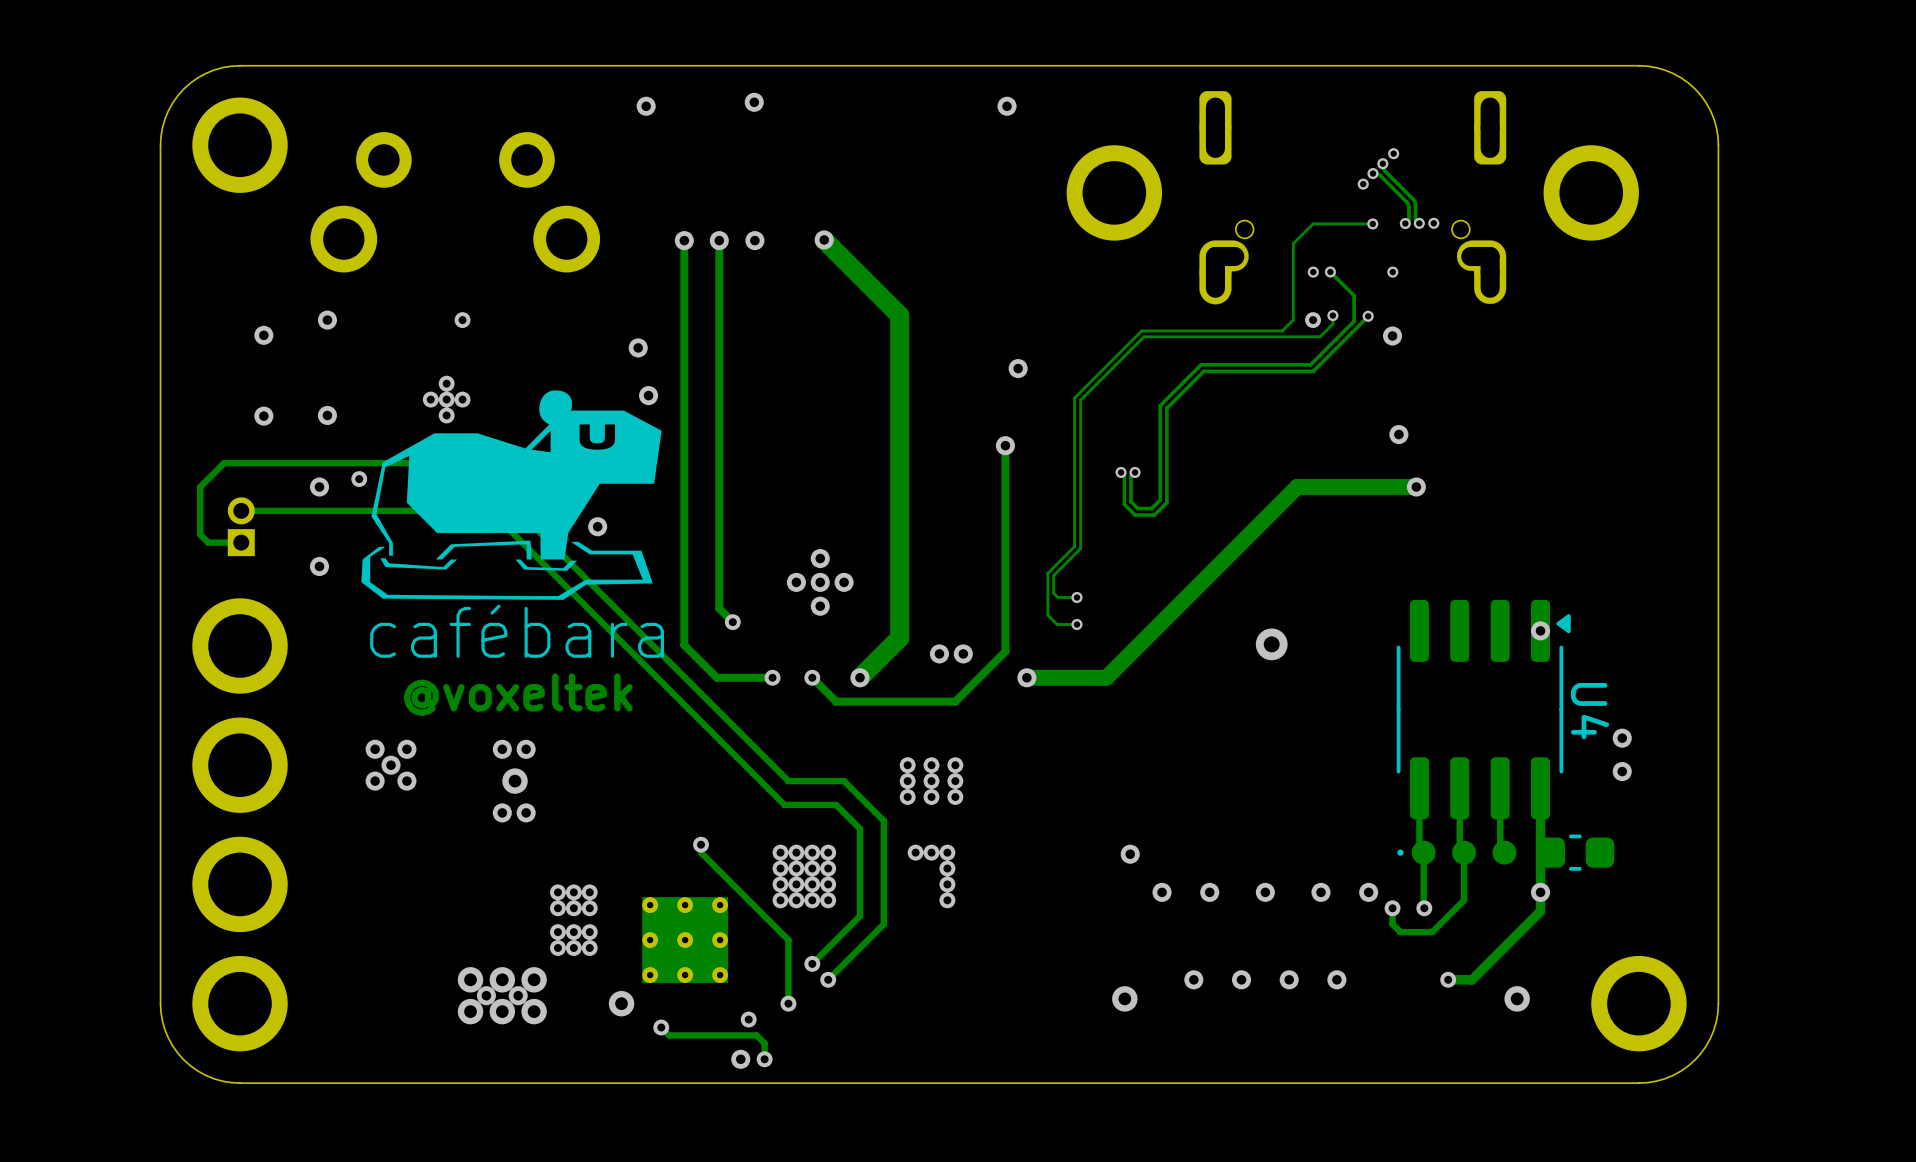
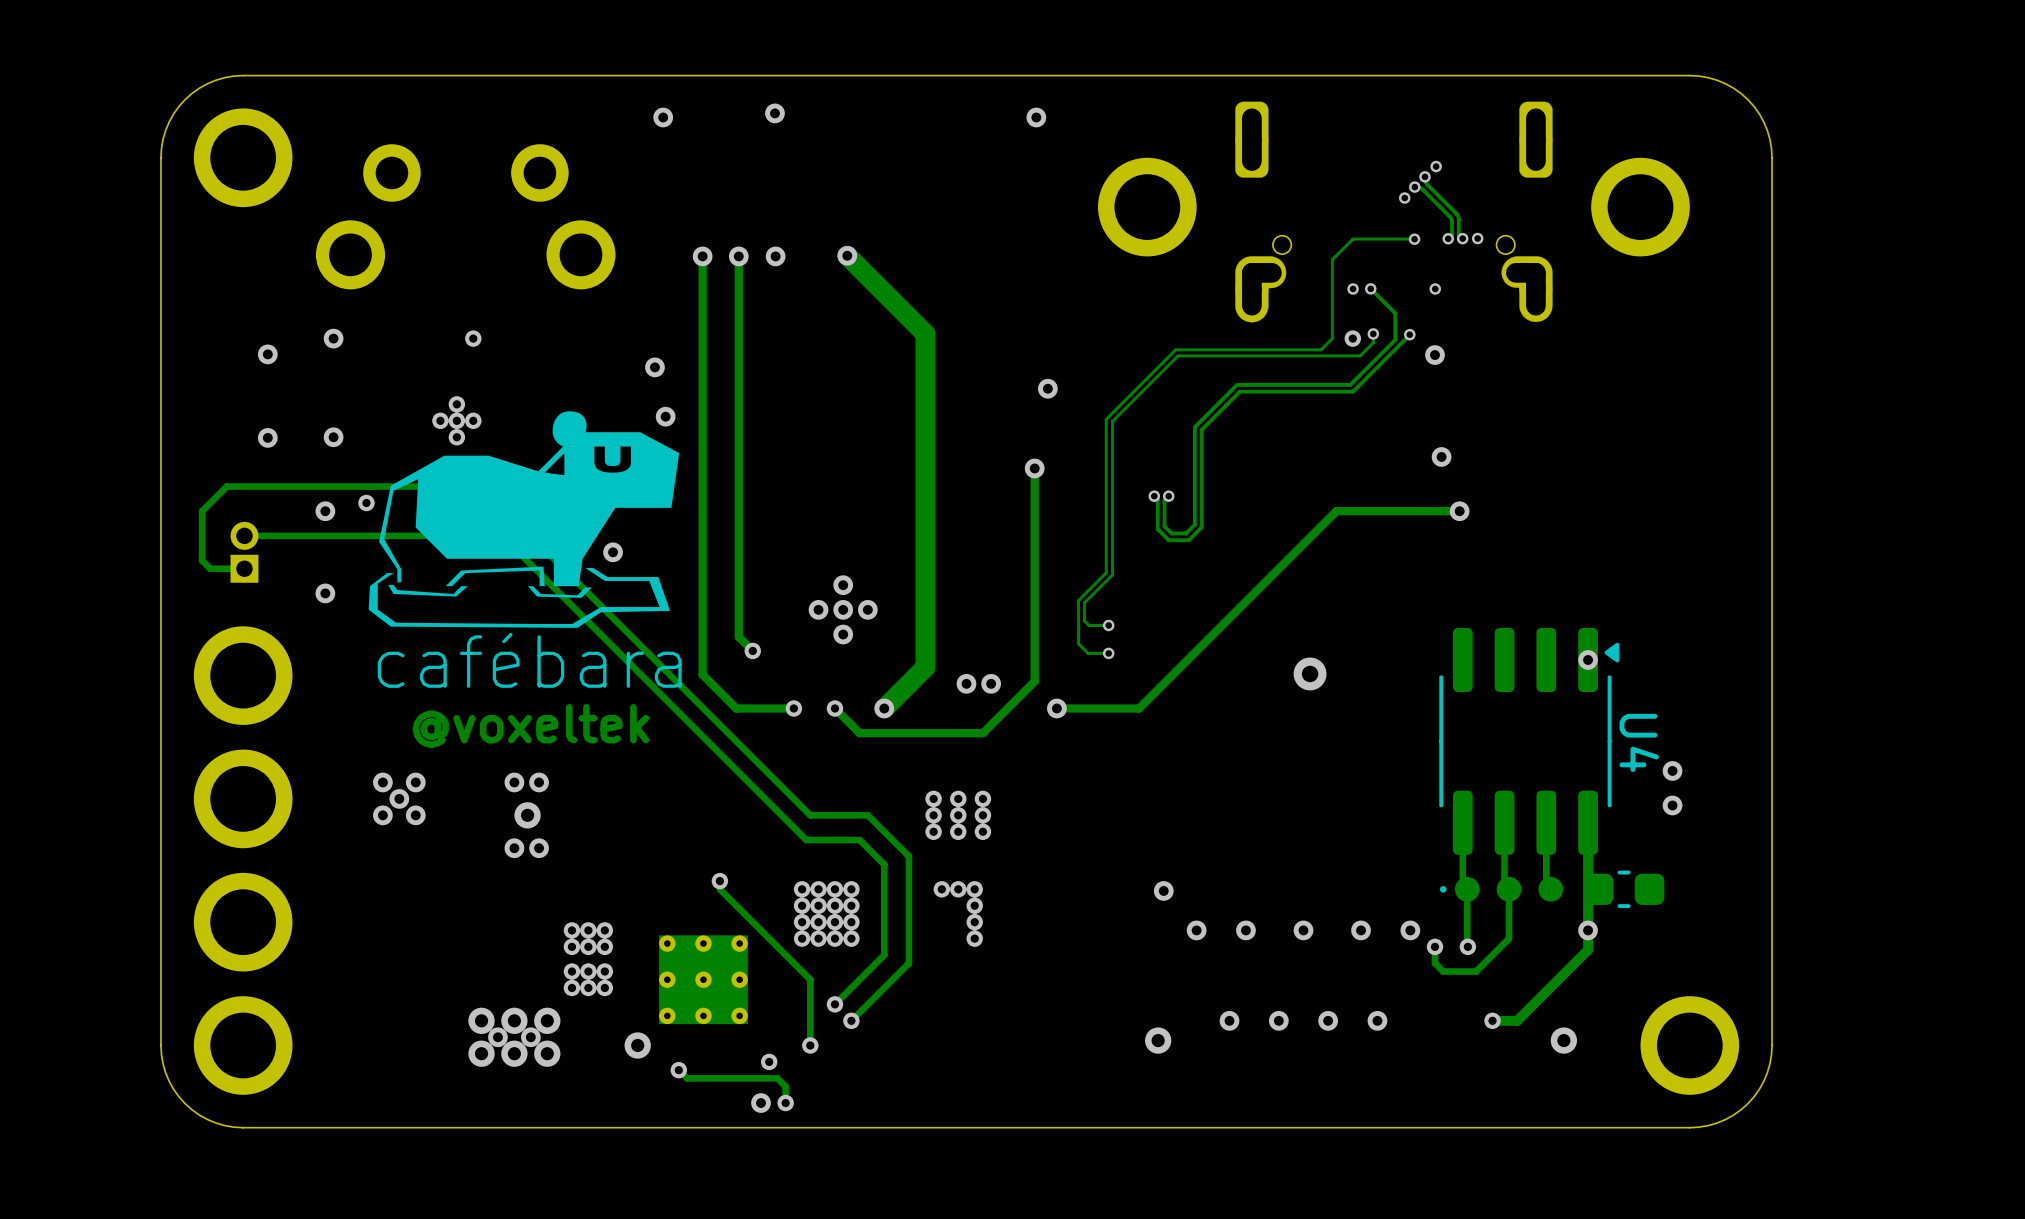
track width: thick (1416, 487) (1297, 487) (1106, 677) (1026, 677) -> thin (1459, 511) (1336, 511) (1139, 708) (1056, 708)

